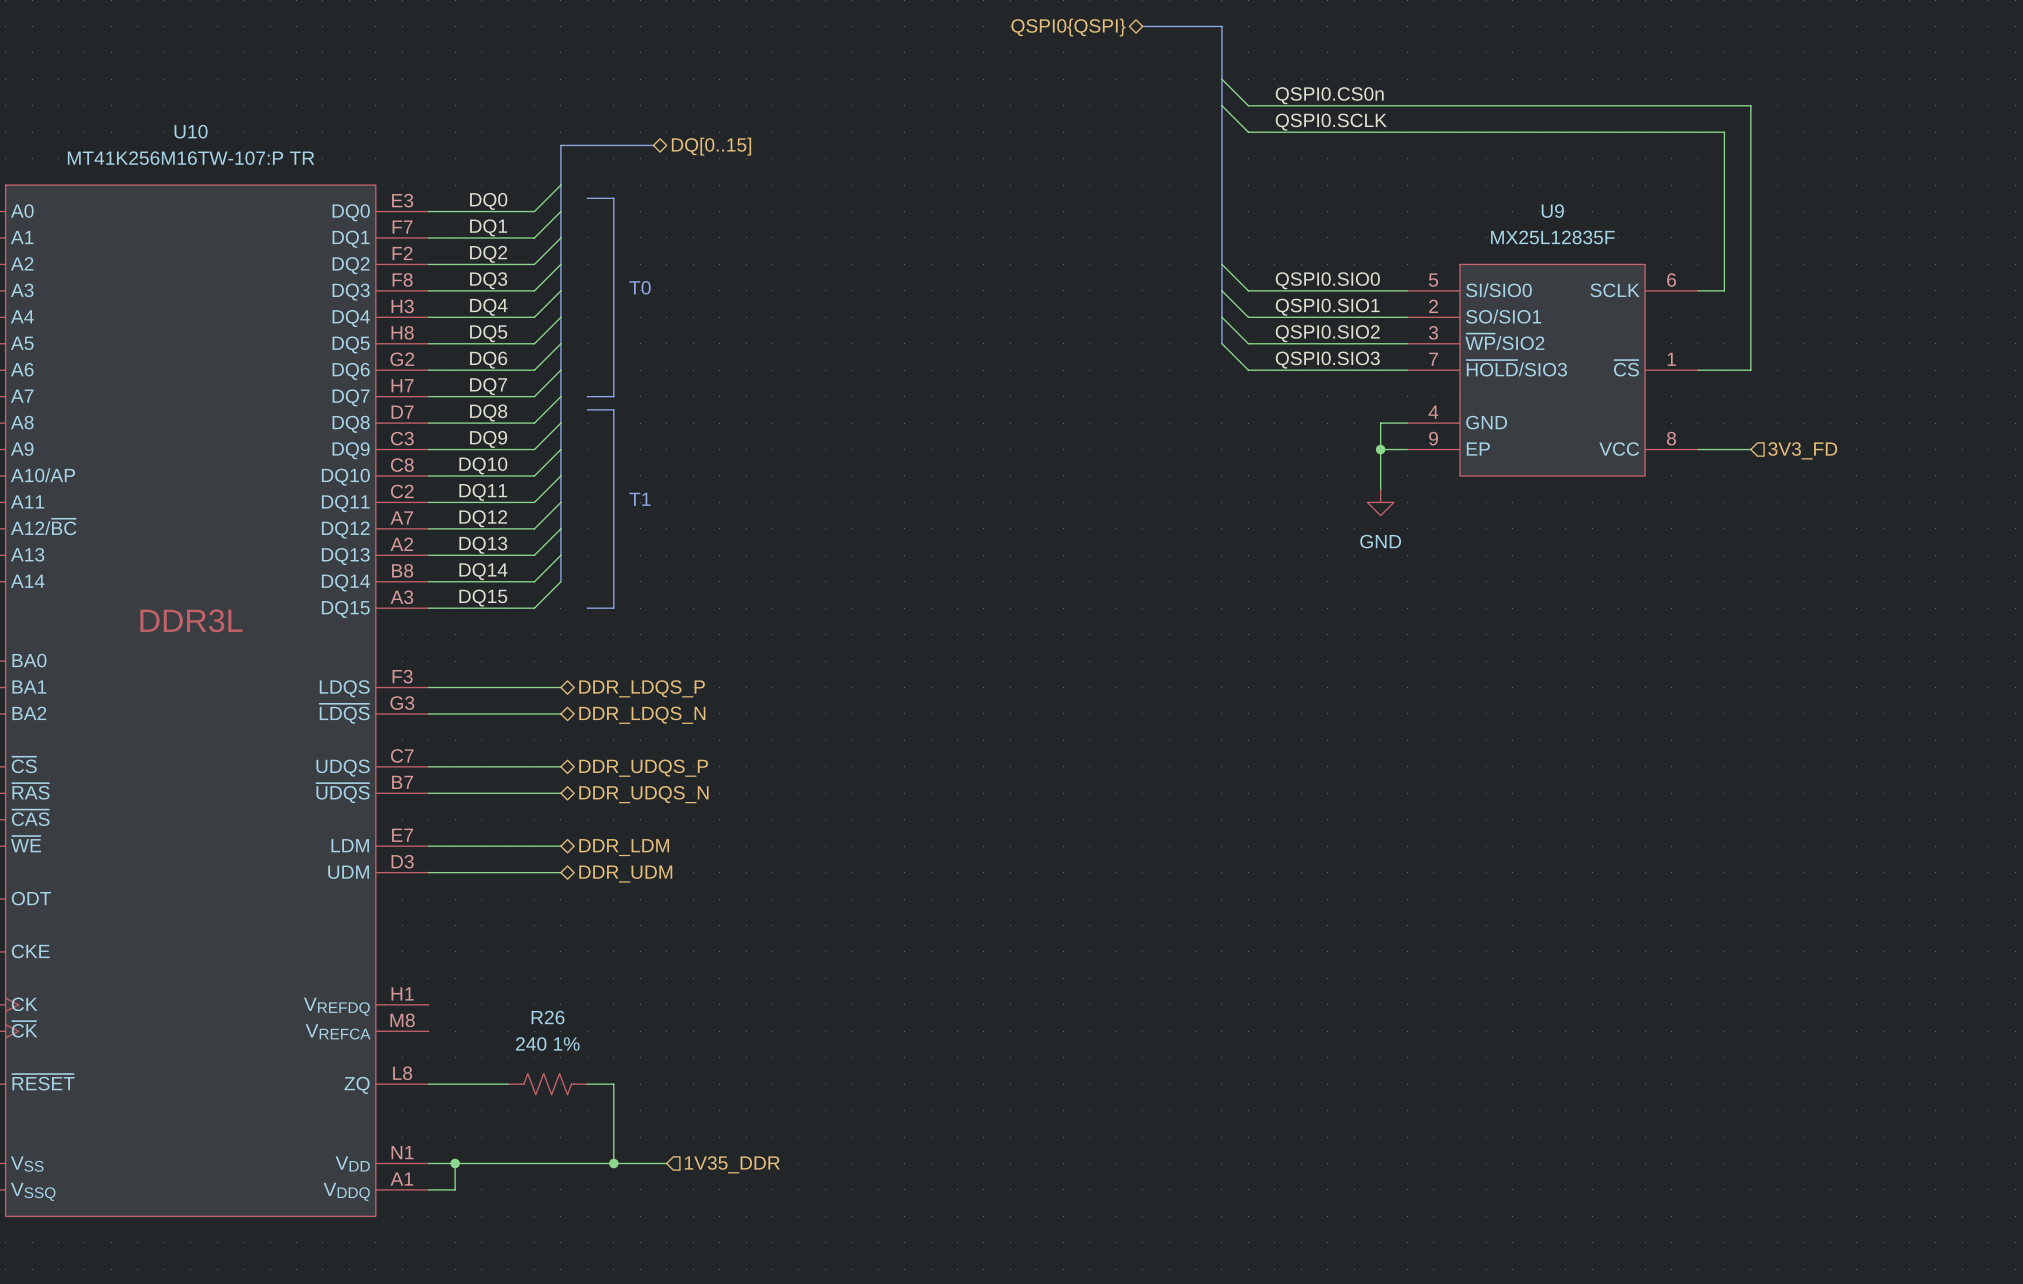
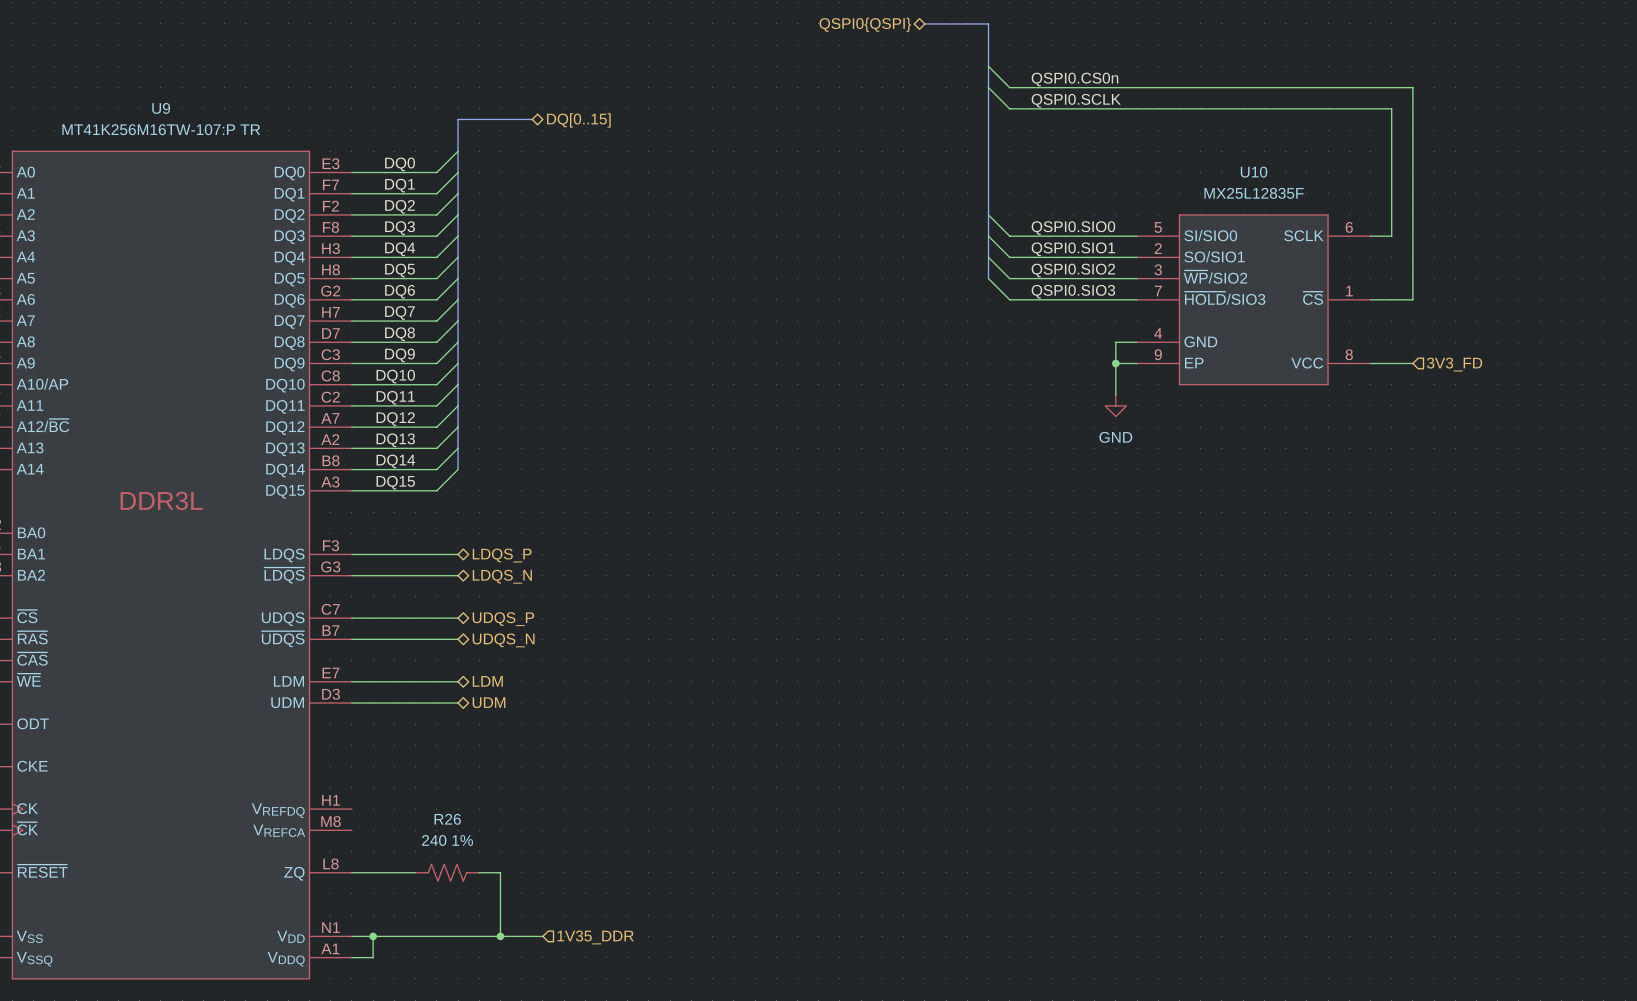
U10 name: U10 (191, 131) -> U9 (161, 108)
line: (587, 198) (613, 198) (613, 396) (587, 396) -> none
U9 name: U9 (1552, 211) -> U10 (1254, 172)
text: T0 (640, 287) -> none
line: (587, 409) (613, 409) (613, 608) (587, 608) -> none
text: T1 (639, 499) -> none
hierarchical label: DDR_LDQS_P (642, 688) -> LDQS_P (502, 555)
hierarchical label: DDR_LDQS_N (642, 715) -> LDQS_N (502, 576)
hierarchical label: DDR_UDQS_P (643, 768) -> UDQS_P (503, 619)
hierarchical label: DDR_UDQS_N (643, 794) -> UDQS_N (503, 640)
hierarchical label: DDR_LDM (624, 847) -> LDM (487, 681)
hierarchical label: DDR_UDM (625, 874) -> UDM (489, 702)

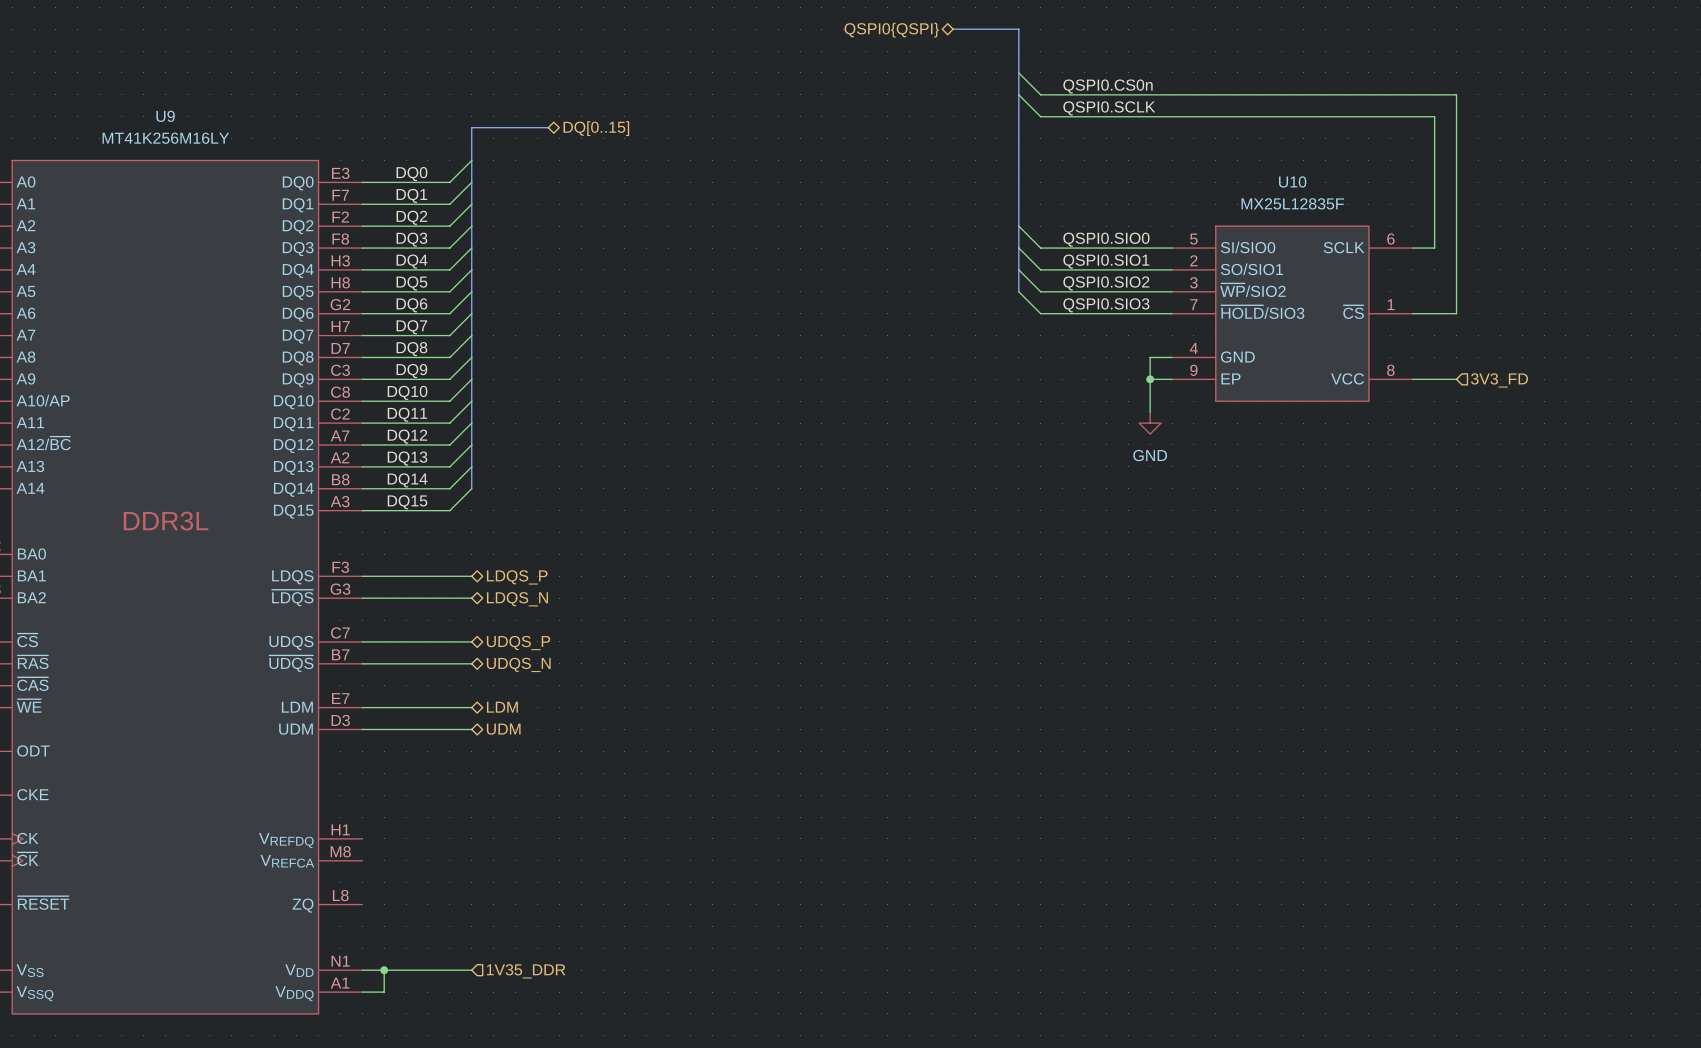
U9 value: MT41K256M16TW-107:P TR (161, 129) -> MT41K256M16LY (165, 138)
wire: (351, 872) (415, 872) -> none
R26: 240 1% (447, 872) -> none
wire: (479, 872) (500, 872) (500, 936) -> none
wire: (458, 936) (542, 936) -> none
junction: (500, 936) -> none
hierarchical label position: 1V35_DDR (595, 937) -> 1V35_DDR (526, 971)

